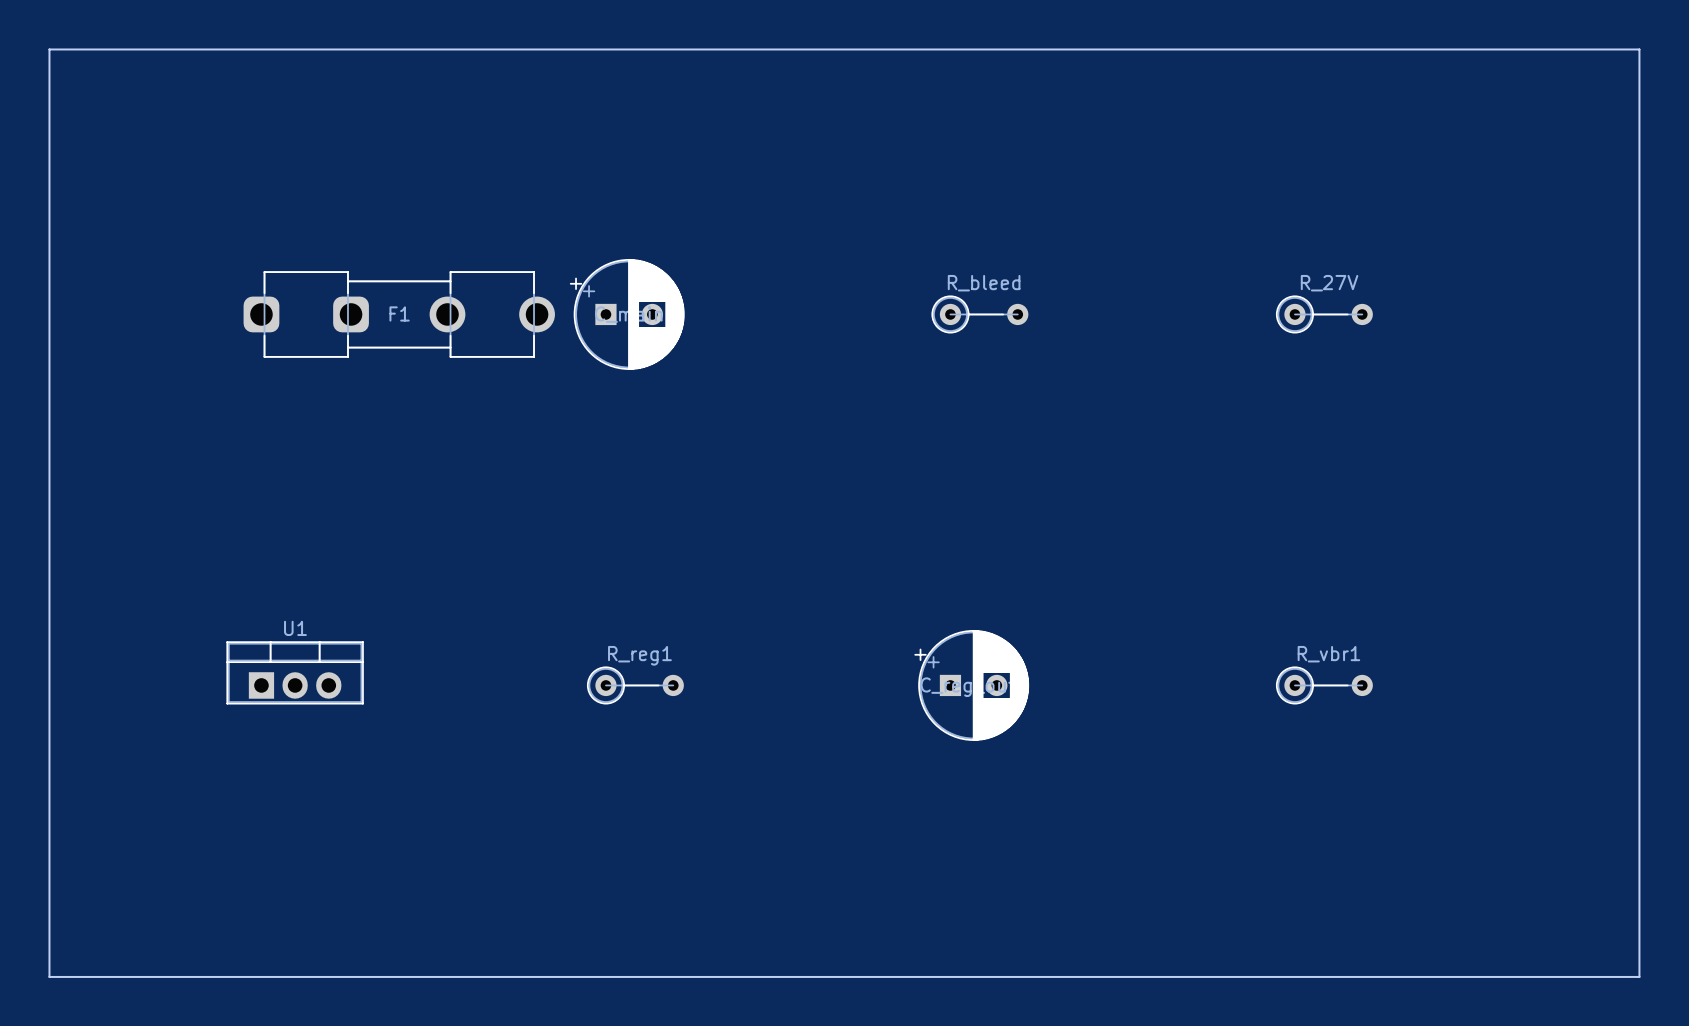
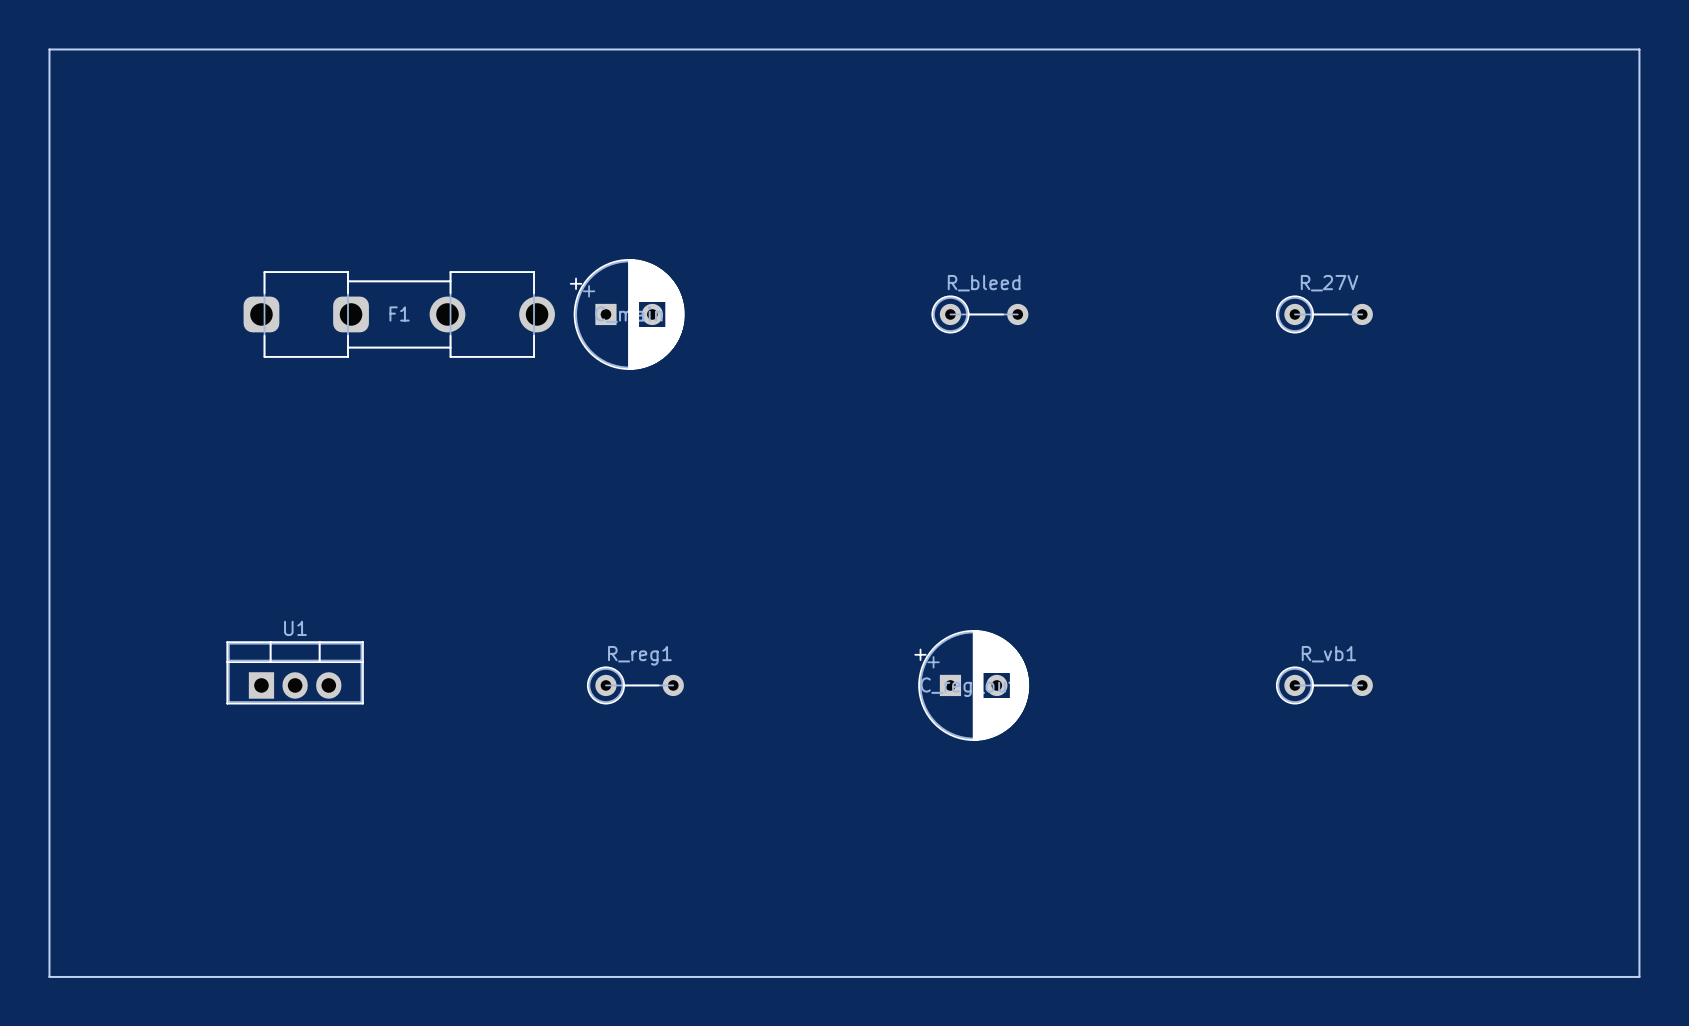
R_vbr1 name: R_vbr1 (1328, 654) -> R_vb1 (1328, 654)

